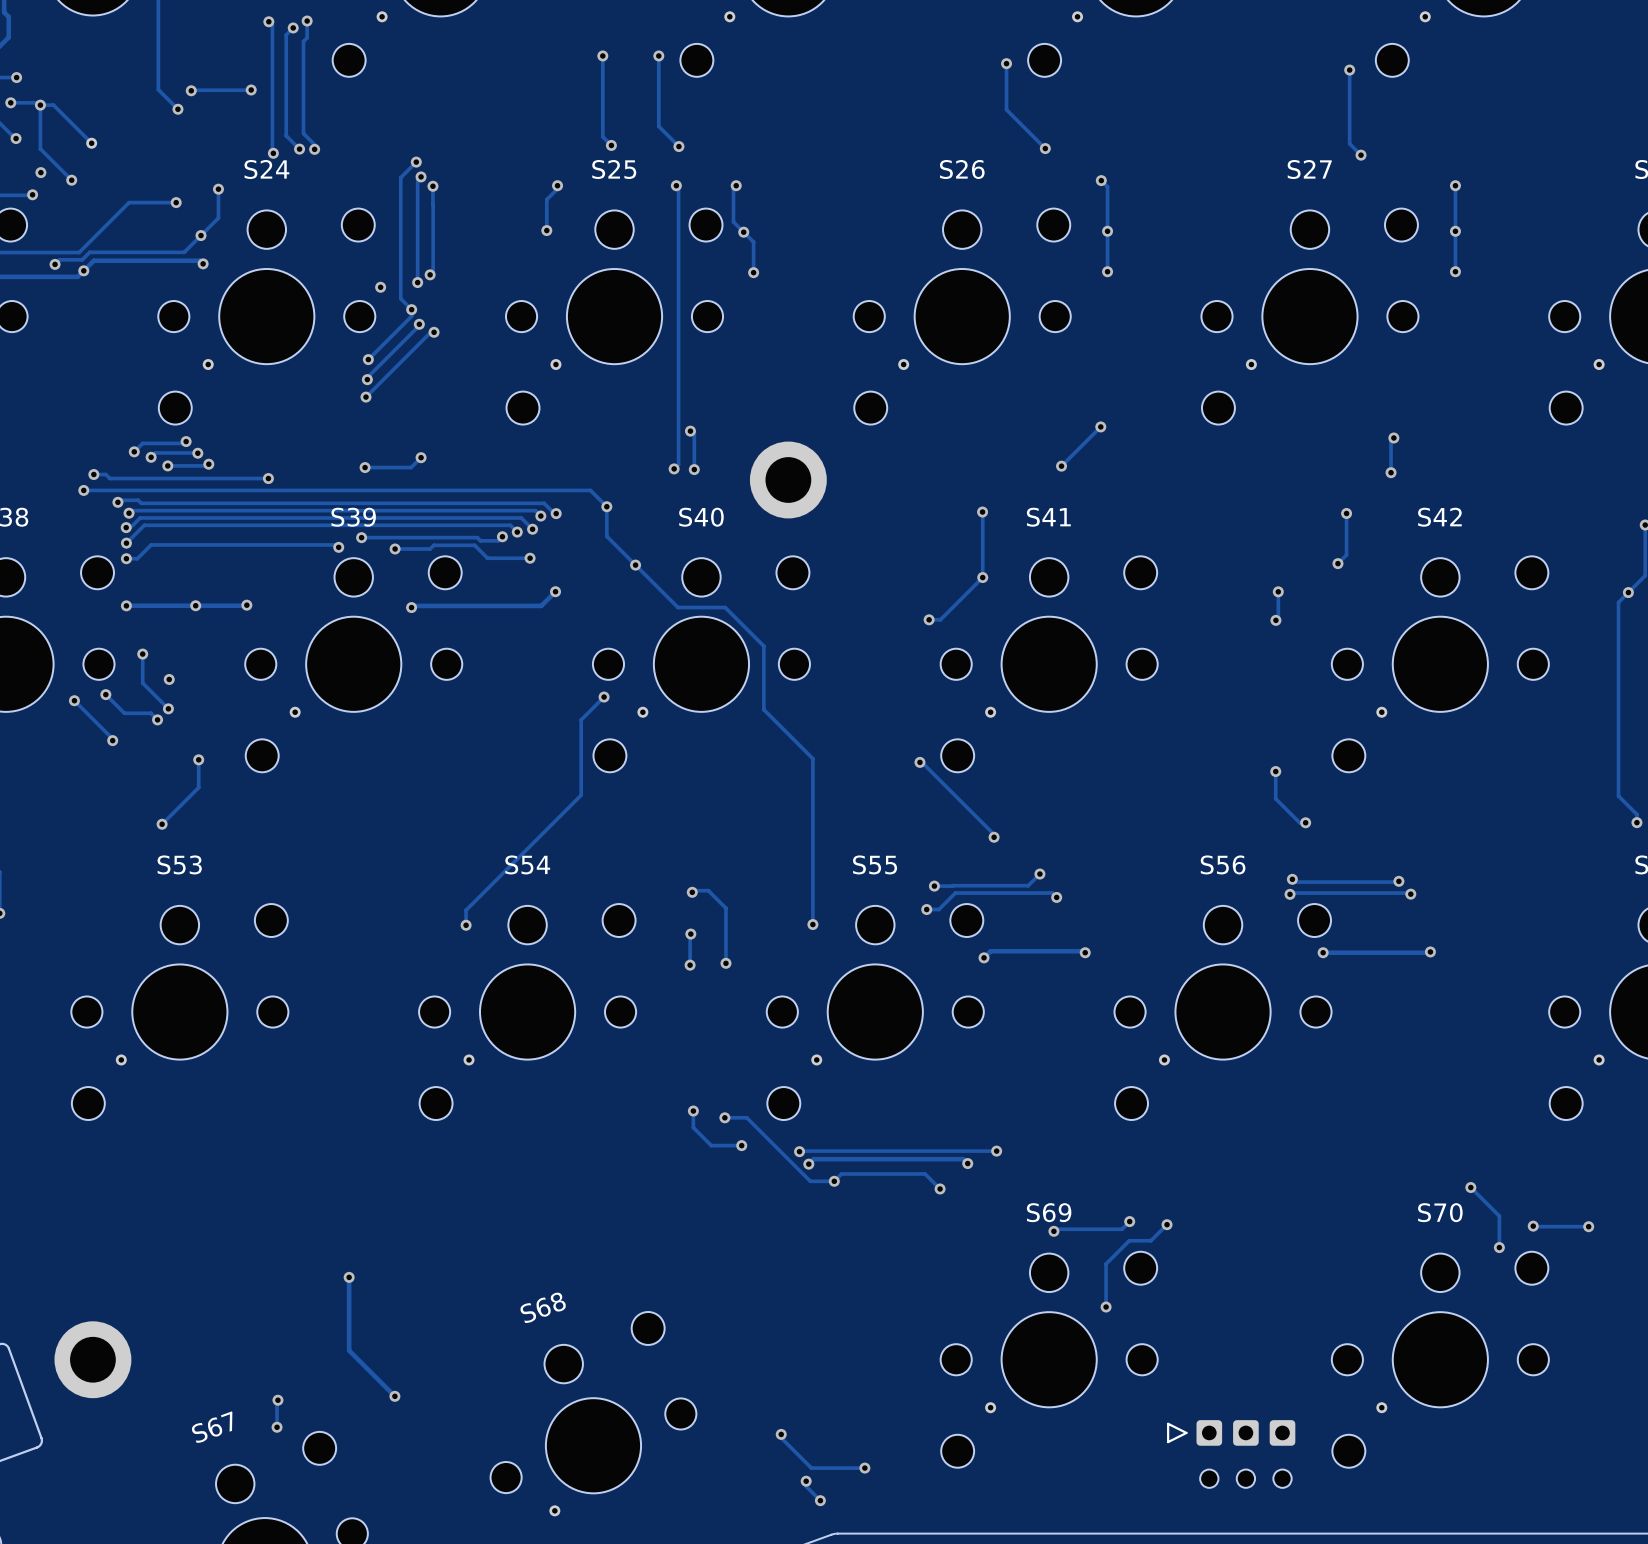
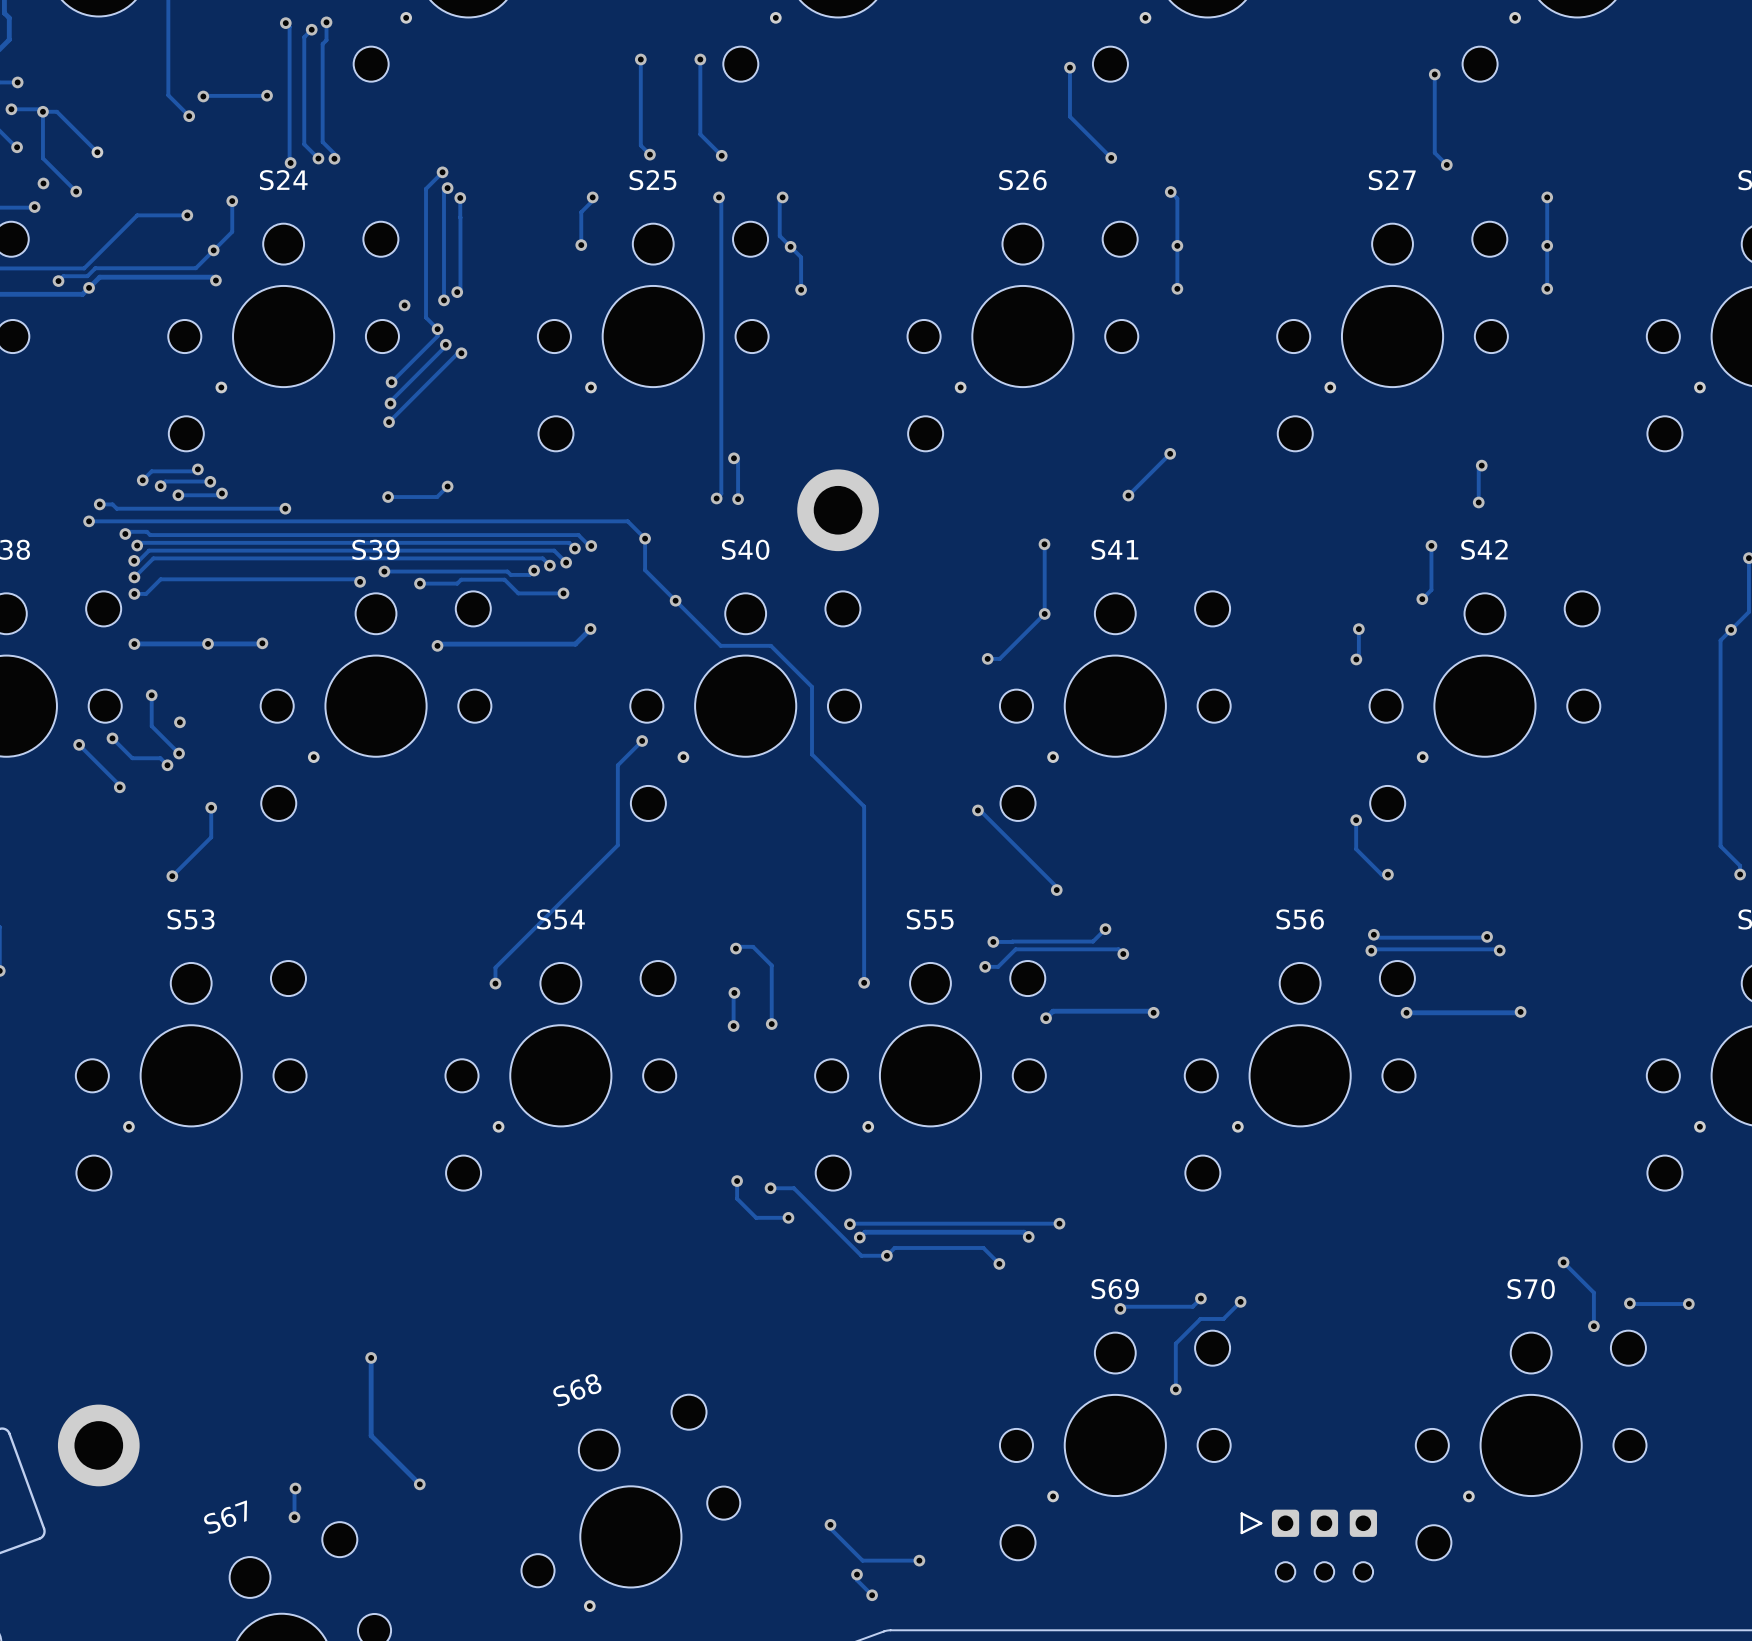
part position: (1440, 577) -> (1484, 613)
S42 position: (1440, 664) -> (1484, 706)
part position: (1381, 712) -> (1422, 757)

